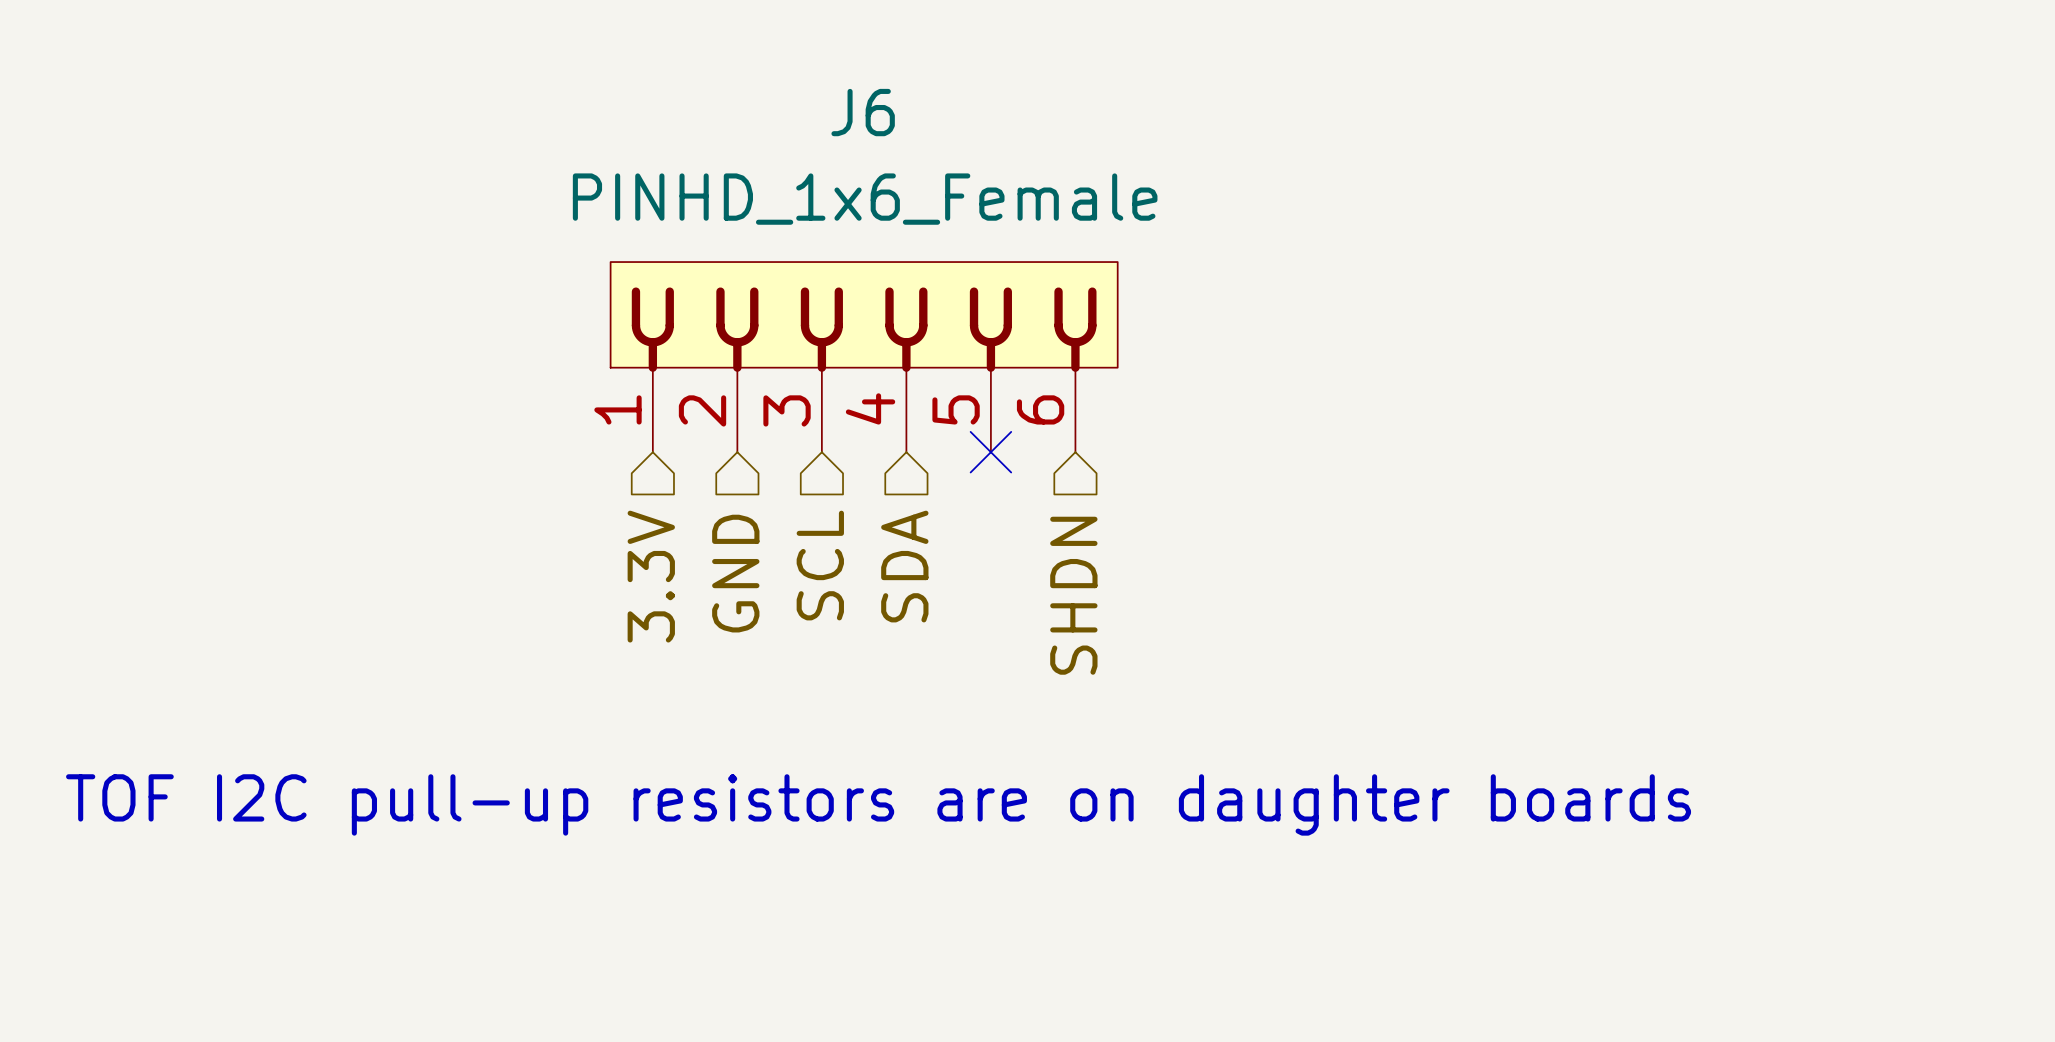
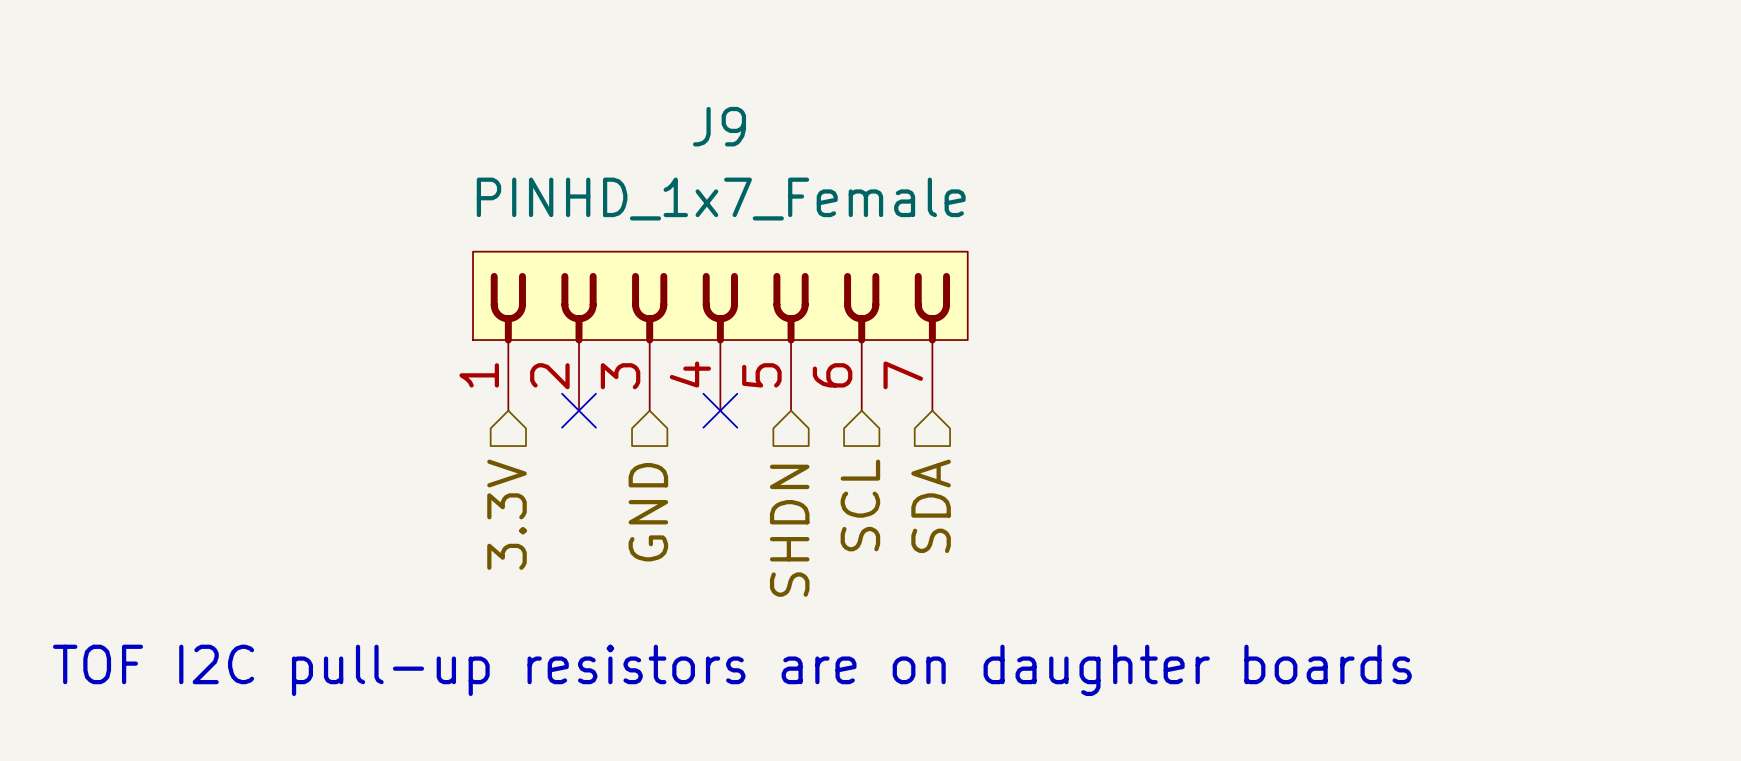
J6: PINHD_1x6_Female (864, 357) -> none
J9: none -> PINHD_1x7_Female (720, 331)
no-connect mark position: (990, 452) -> (720, 410)
no-connect mark: none -> (579, 410)
hierarchical label position: SCL (820, 565) -> SCL (860, 505)
hierarchical label position: SDA (904, 566) -> SDA (931, 506)
hierarchical label position: GND (735, 573) -> GND (648, 512)
hierarchical label position: 3.3V (651, 576) -> 3.3V (507, 514)
hierarchical label position: SHDN (1073, 595) -> SHDN (789, 530)

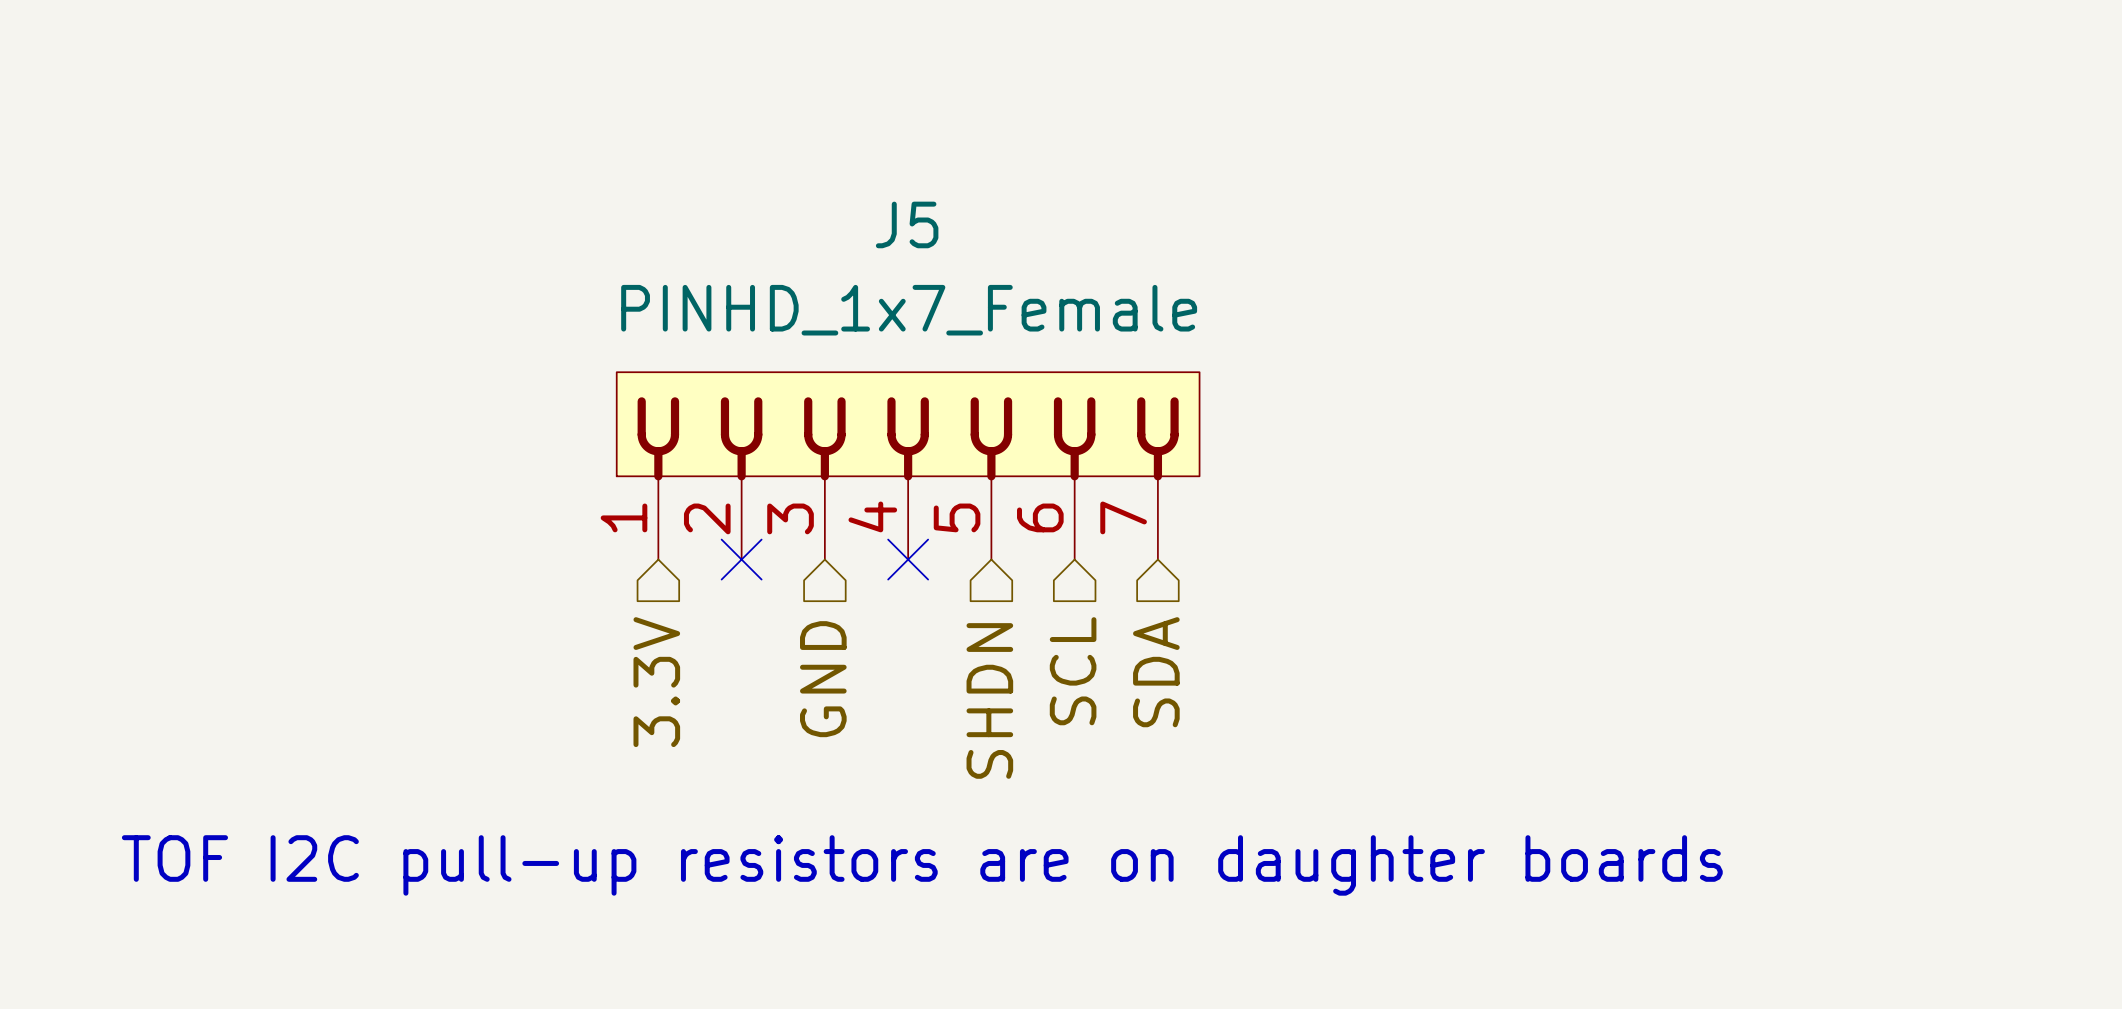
J9 name: J9 (719, 126) -> J5 (907, 224)

